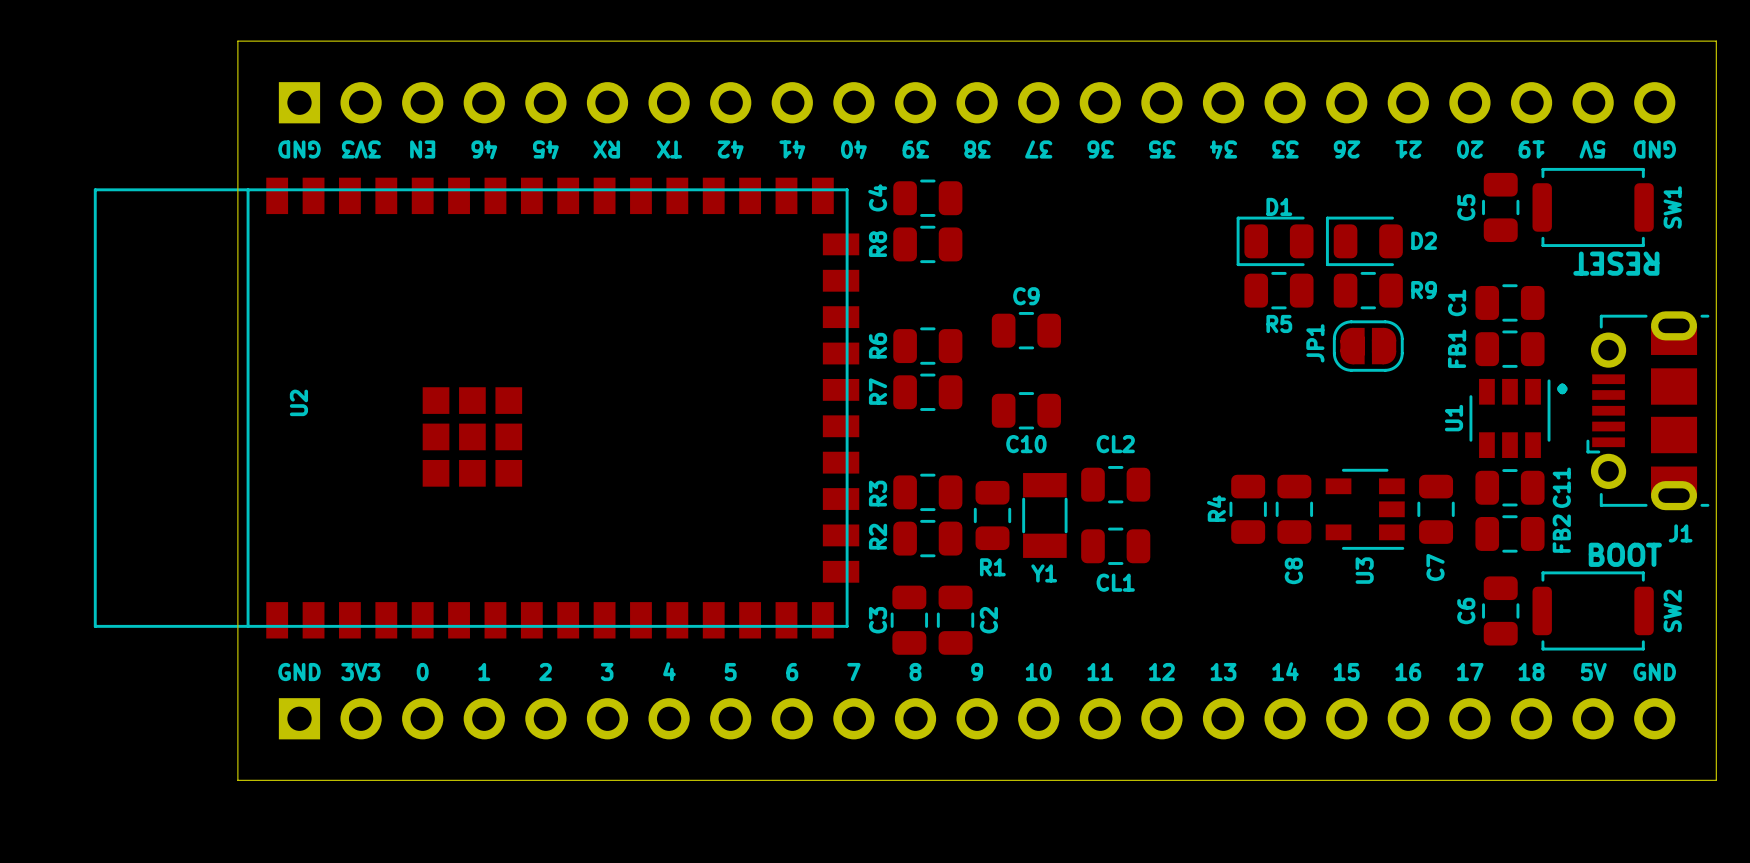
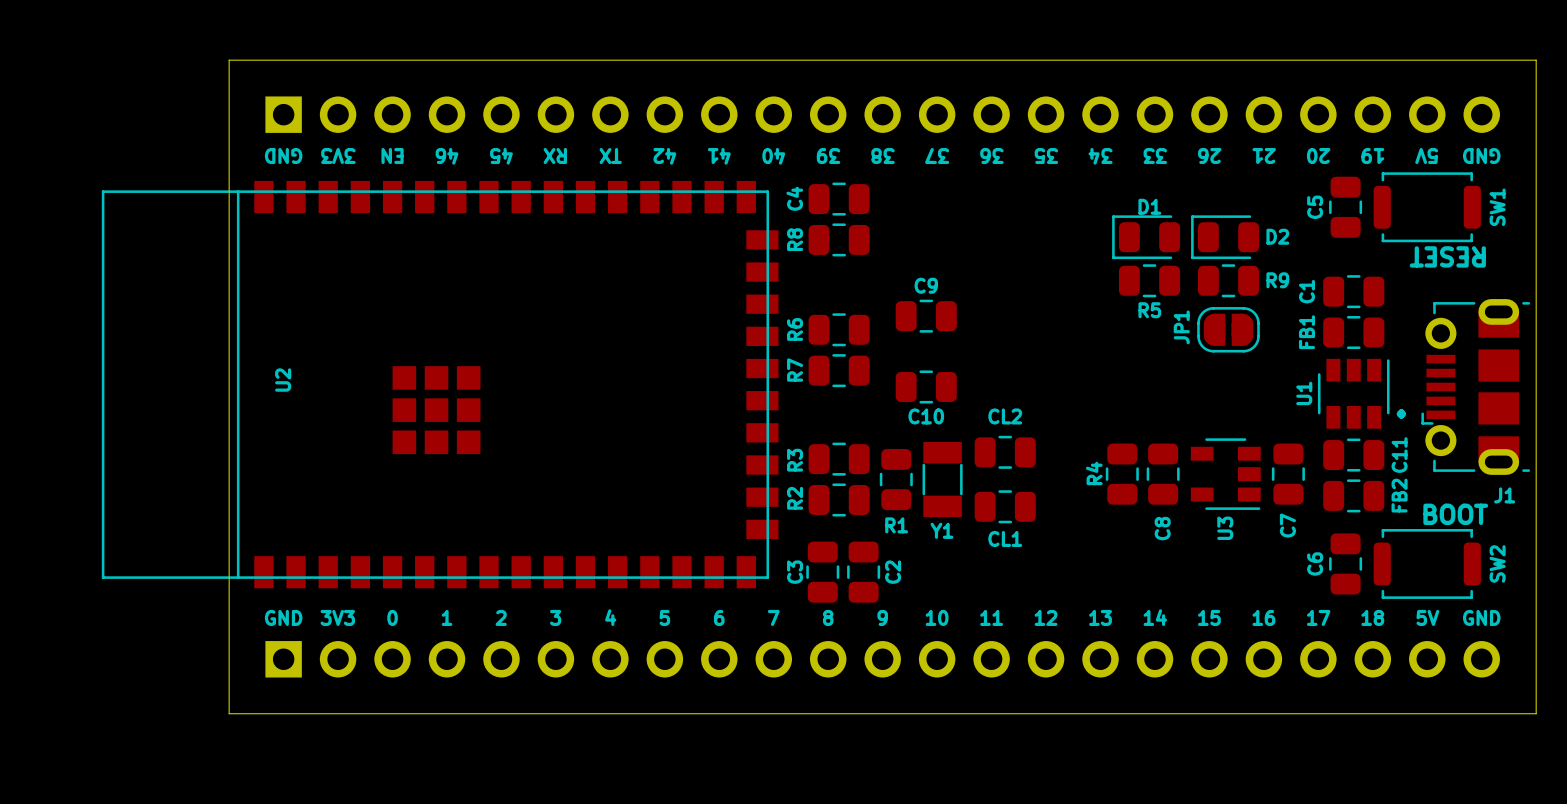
text position: . (1562, 388) -> . (1401, 413)

